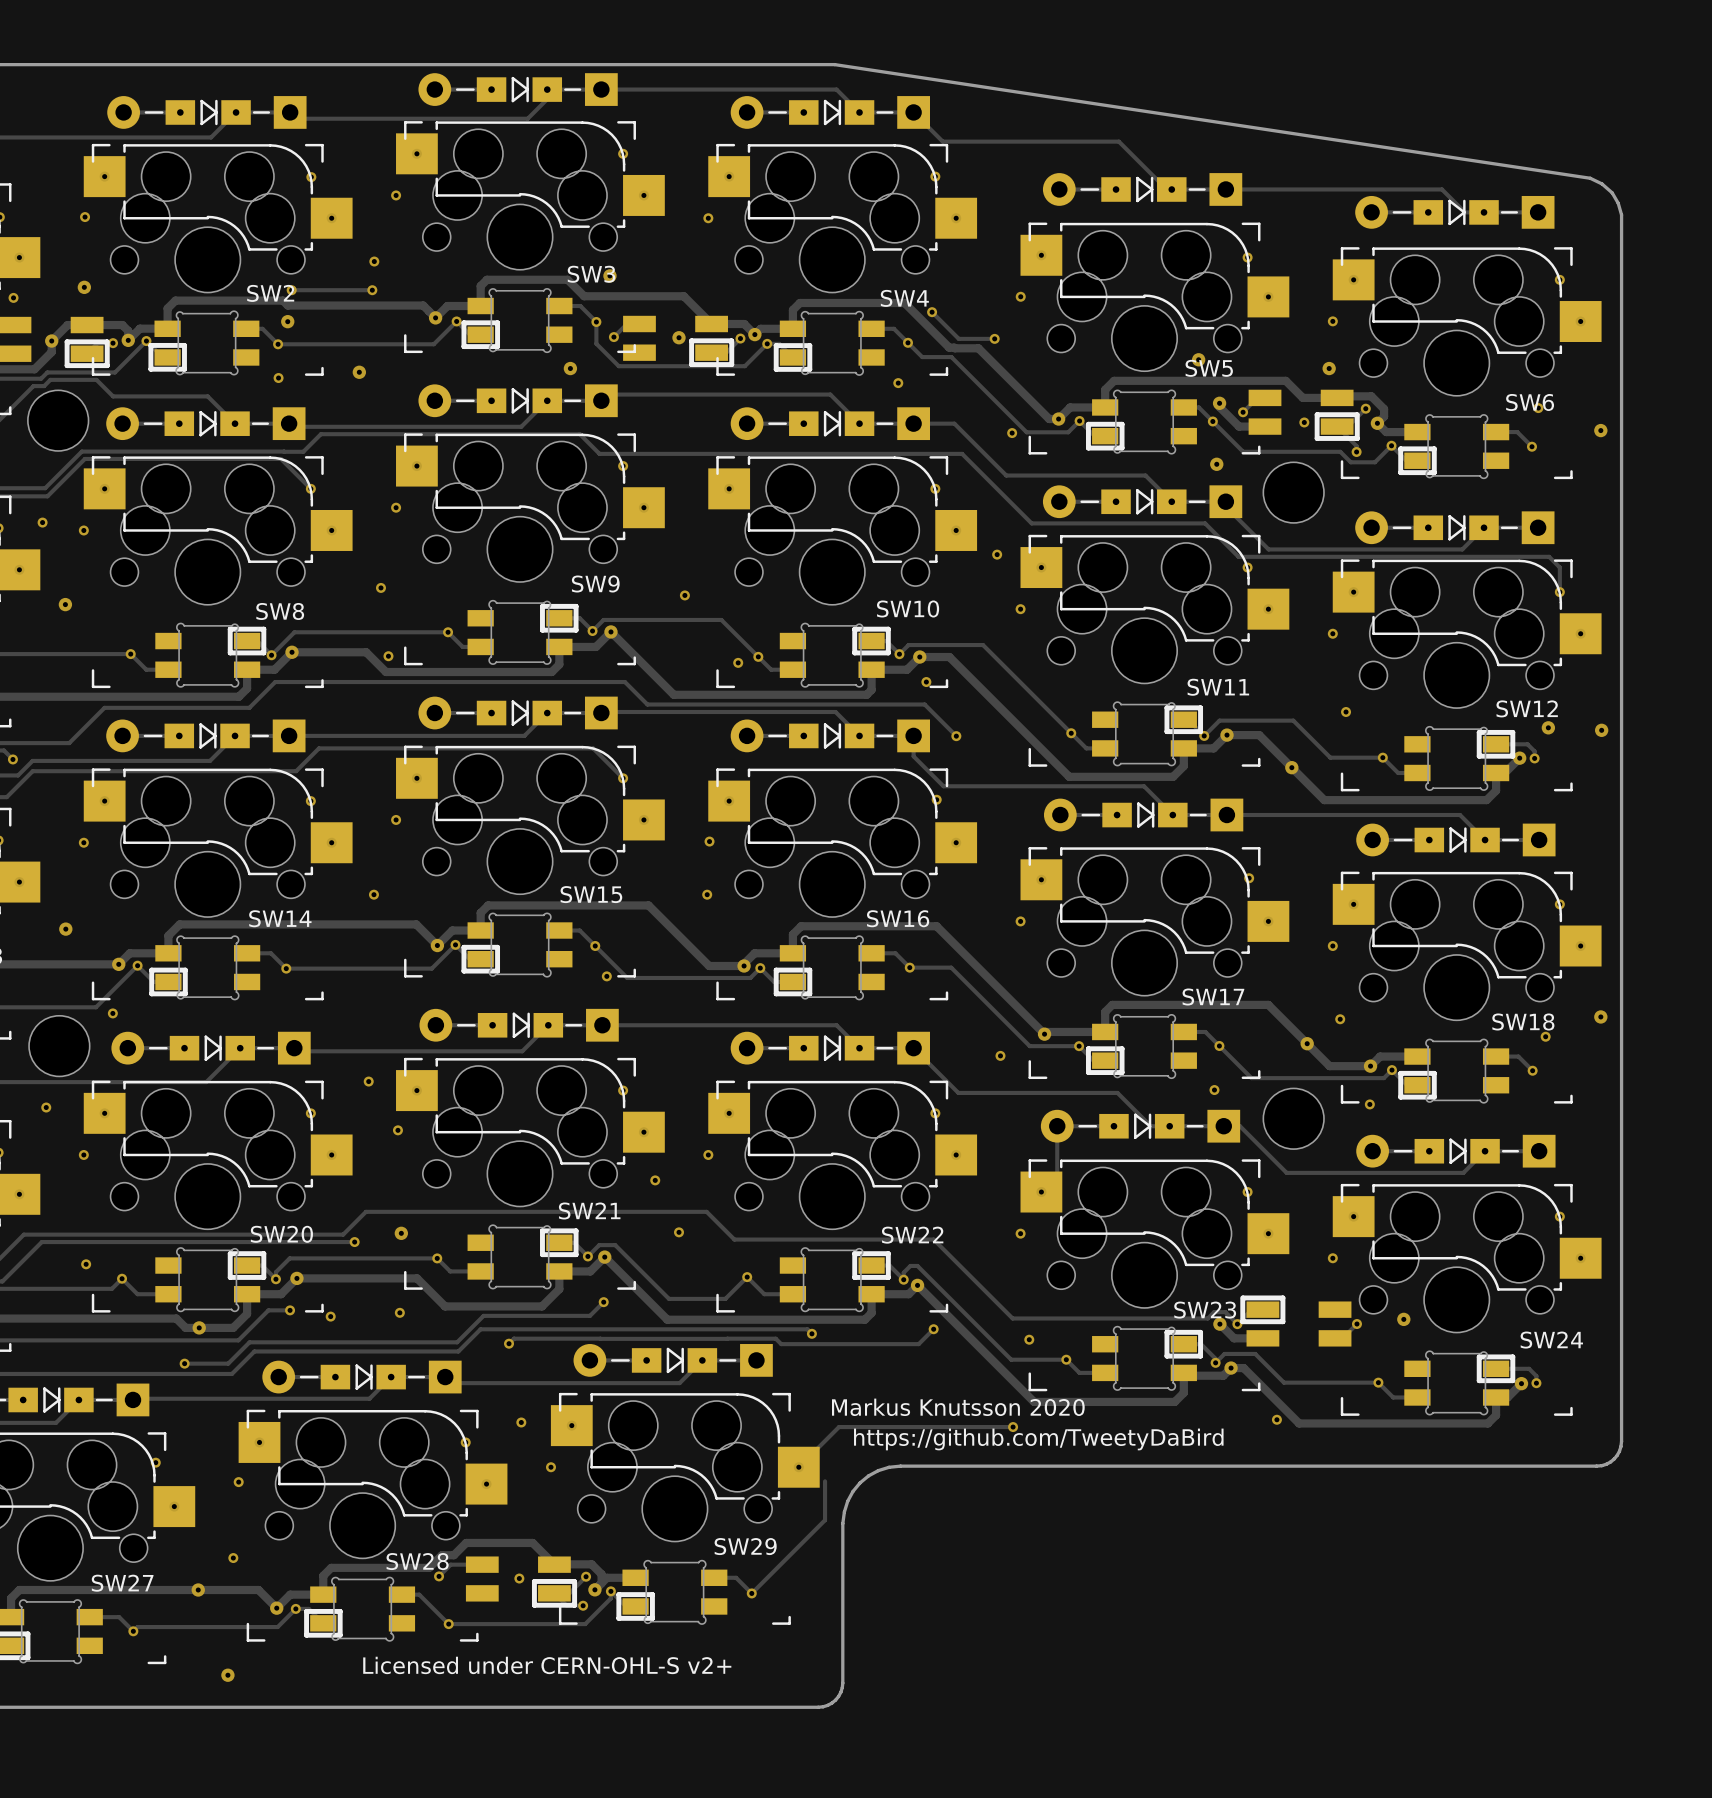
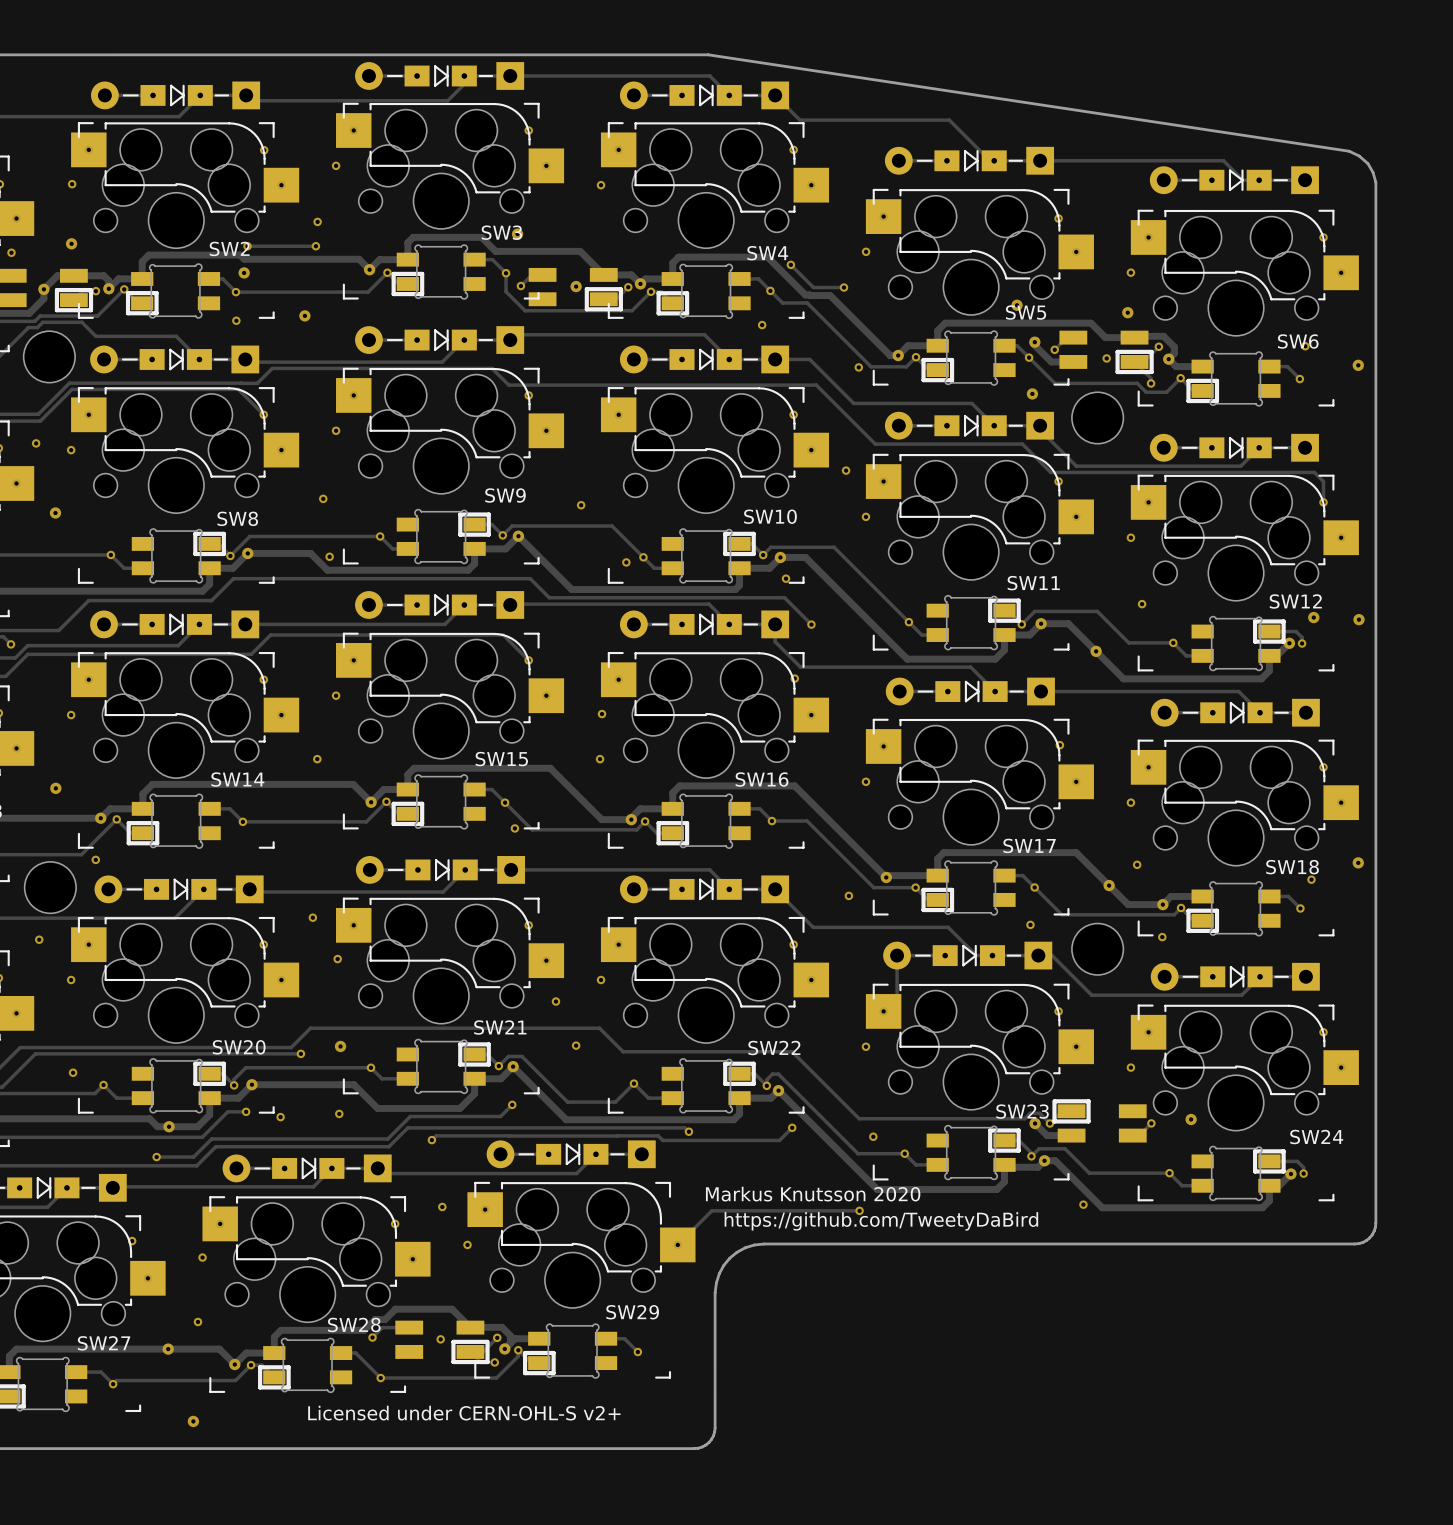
via: (570, 368) -> none
track: (825, 1481) (825, 1520) (751, 1593) -> none

